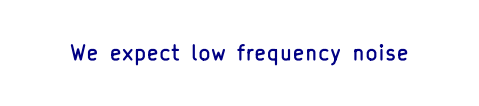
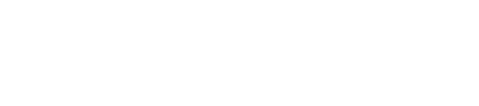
text: We expect low frequency noise (239, 54) -> none

